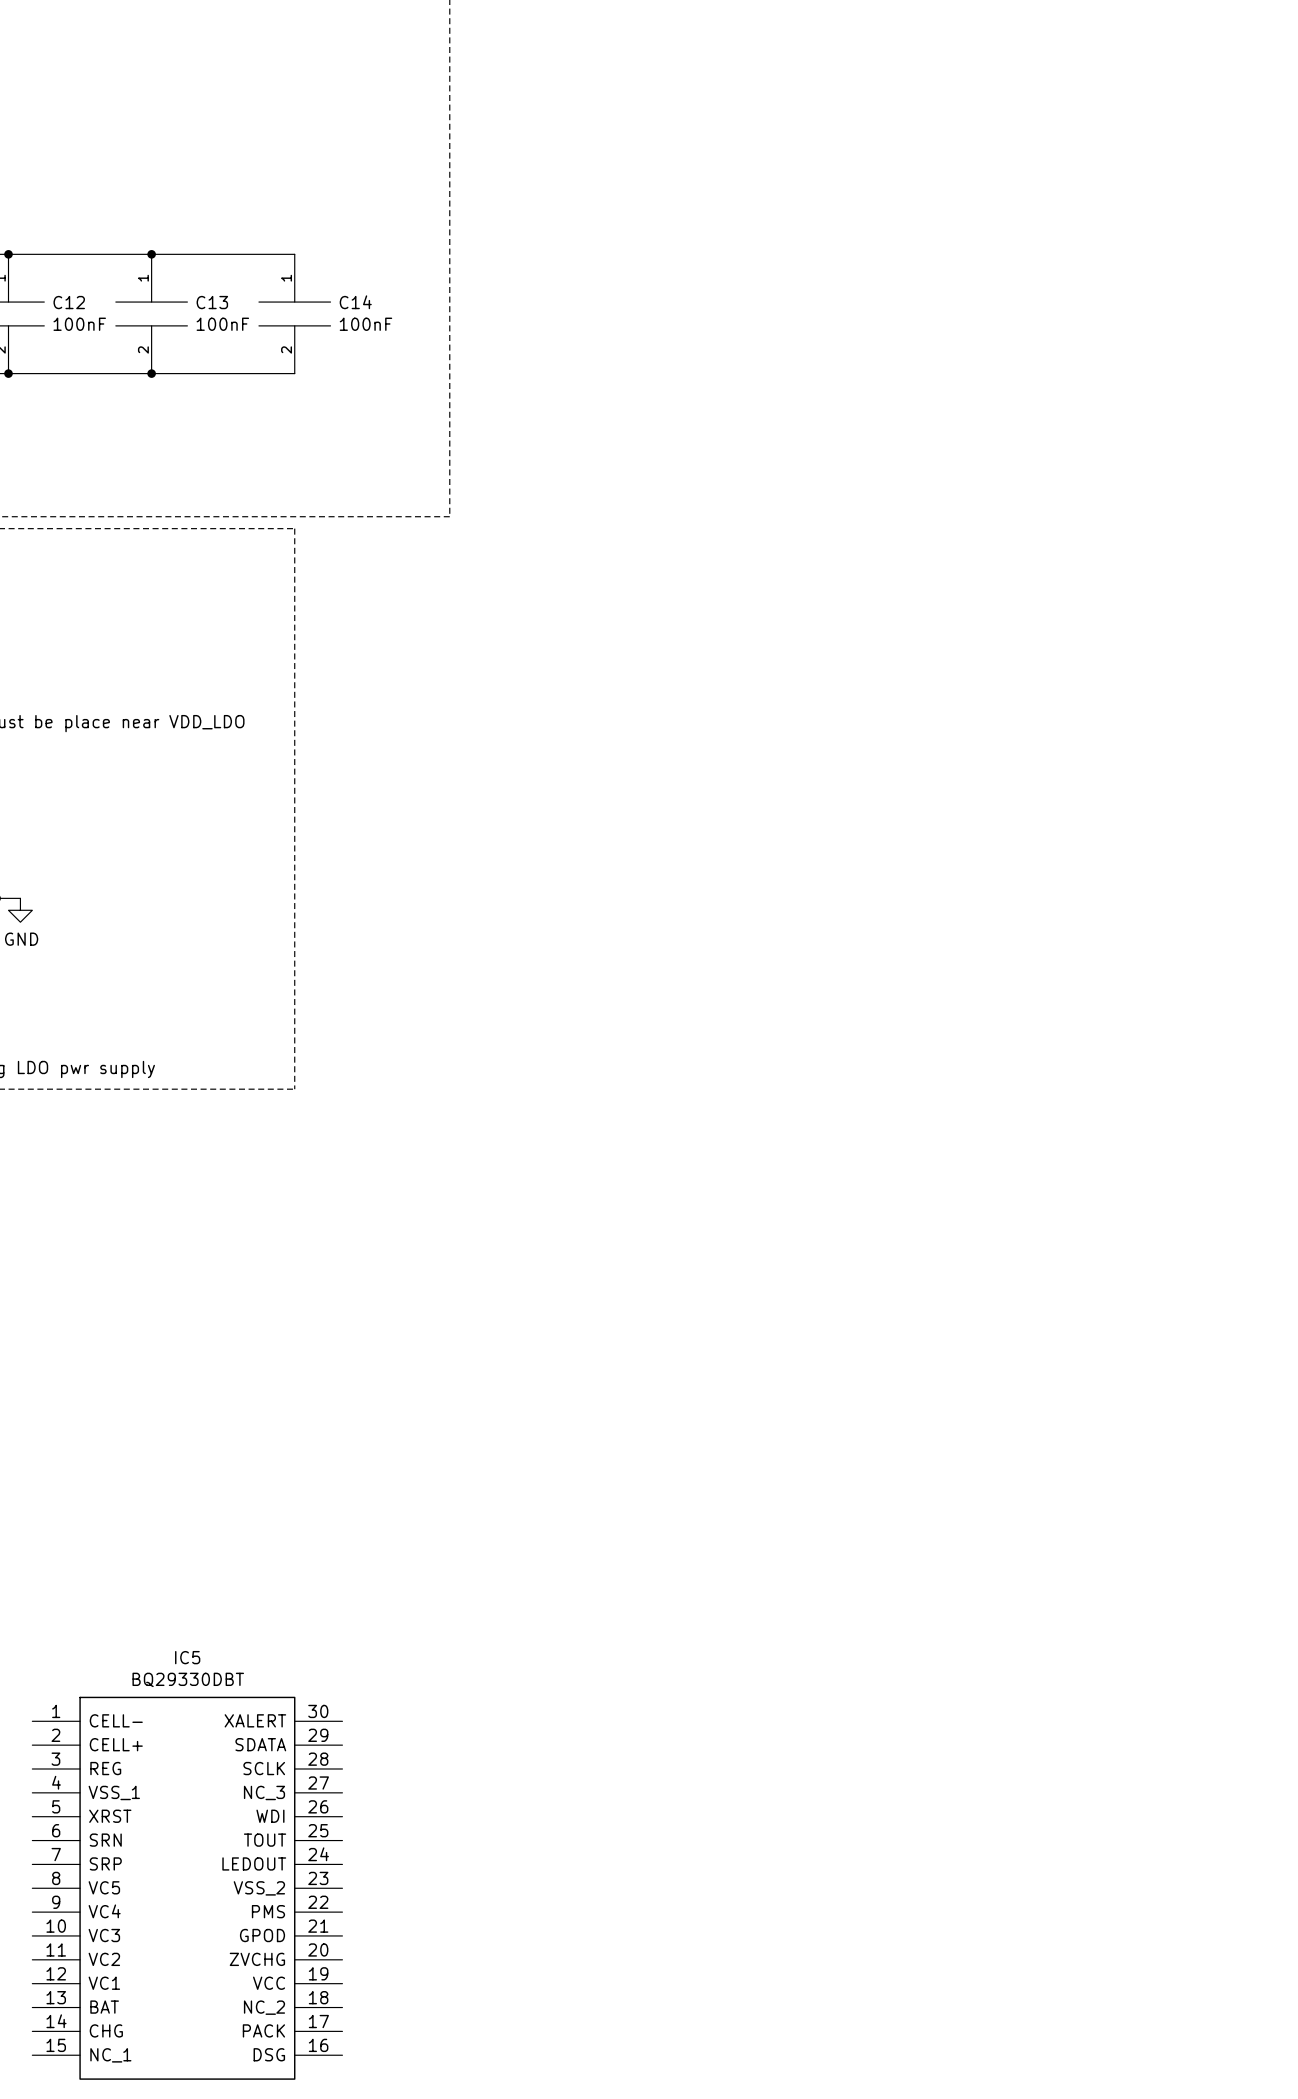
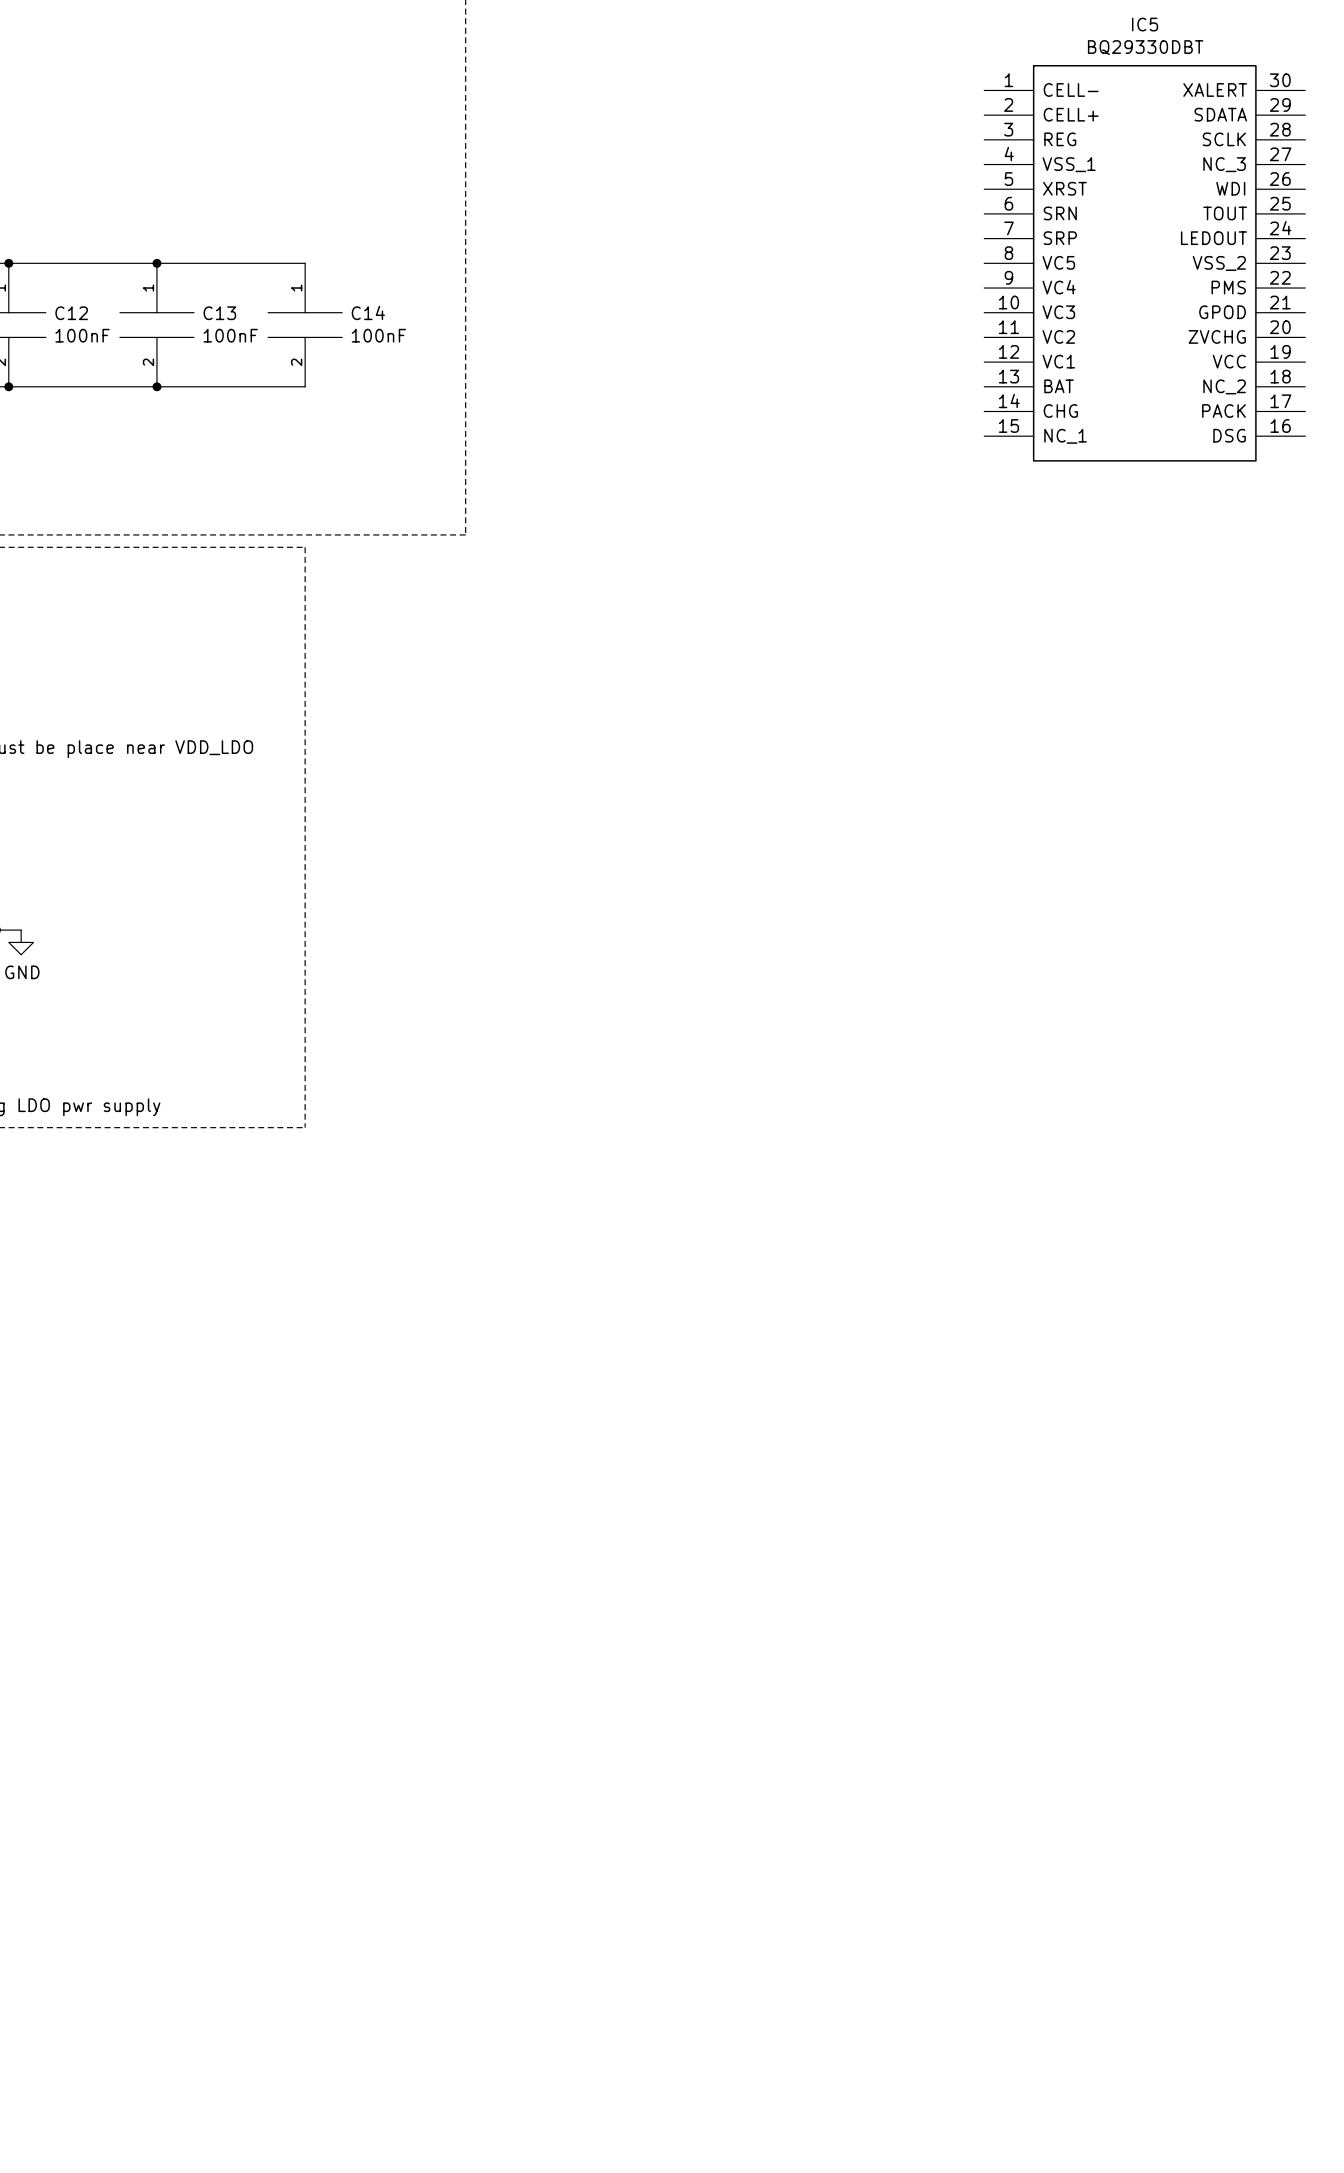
IC5 position: (187, 1888) -> (1144, 263)

